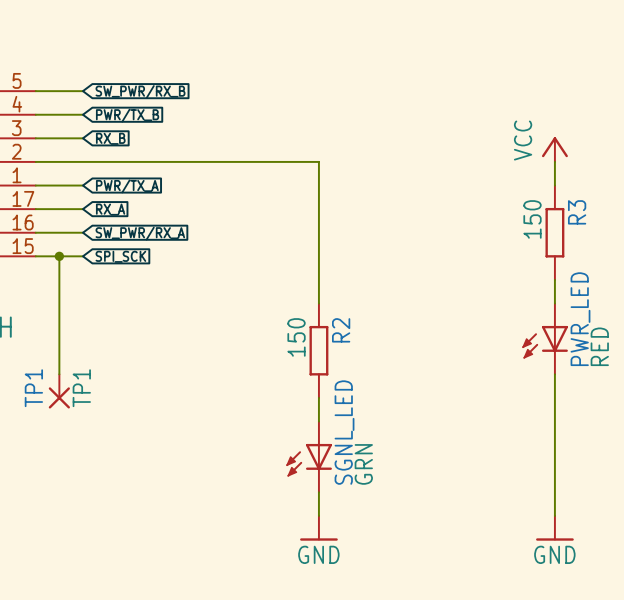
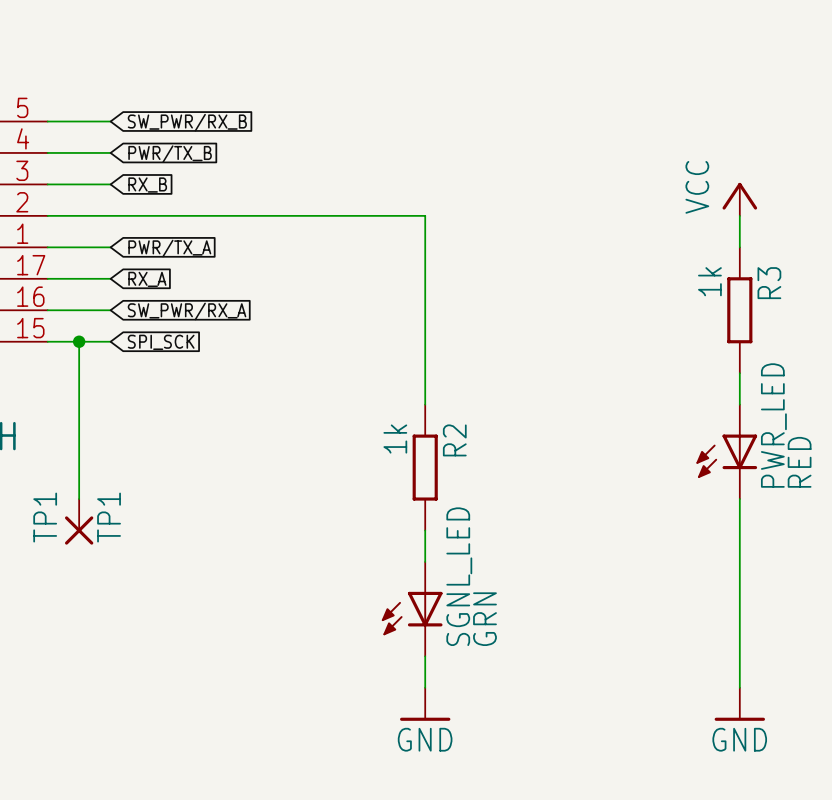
R3 value: 150 (532, 219) -> 1k (709, 281)
R2 value: 150 (296, 337) -> 1k (395, 439)

